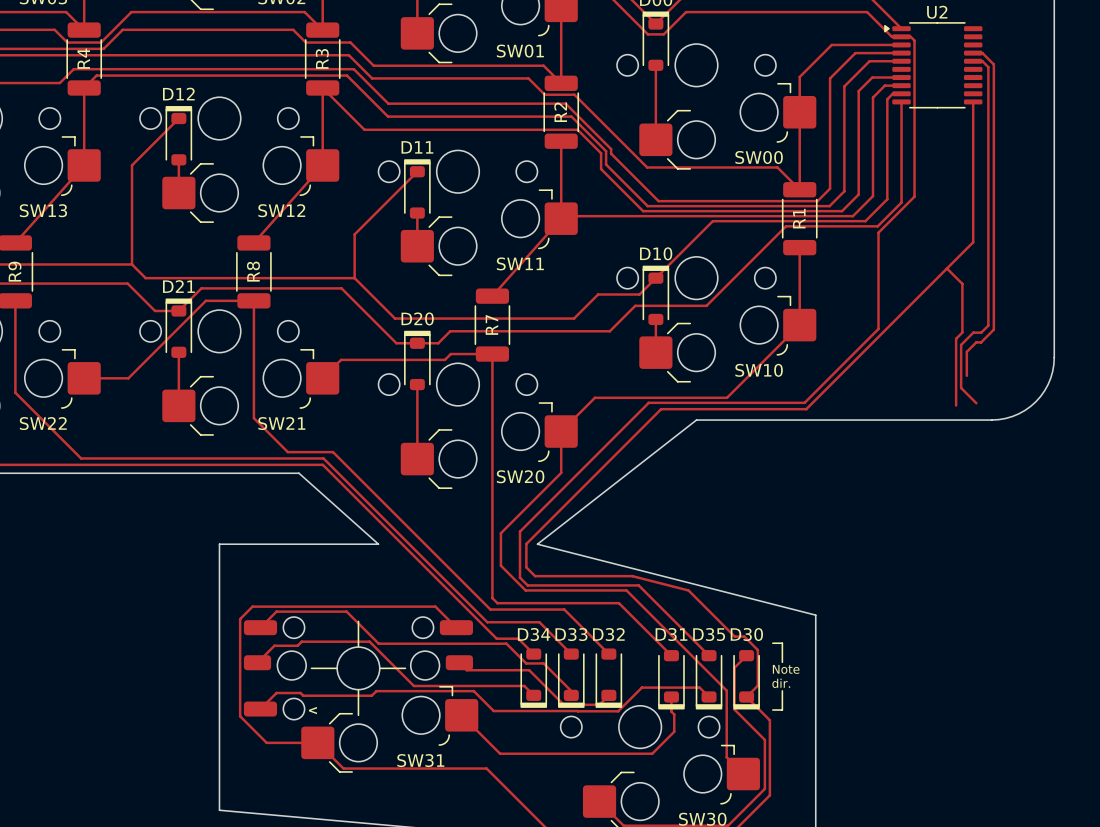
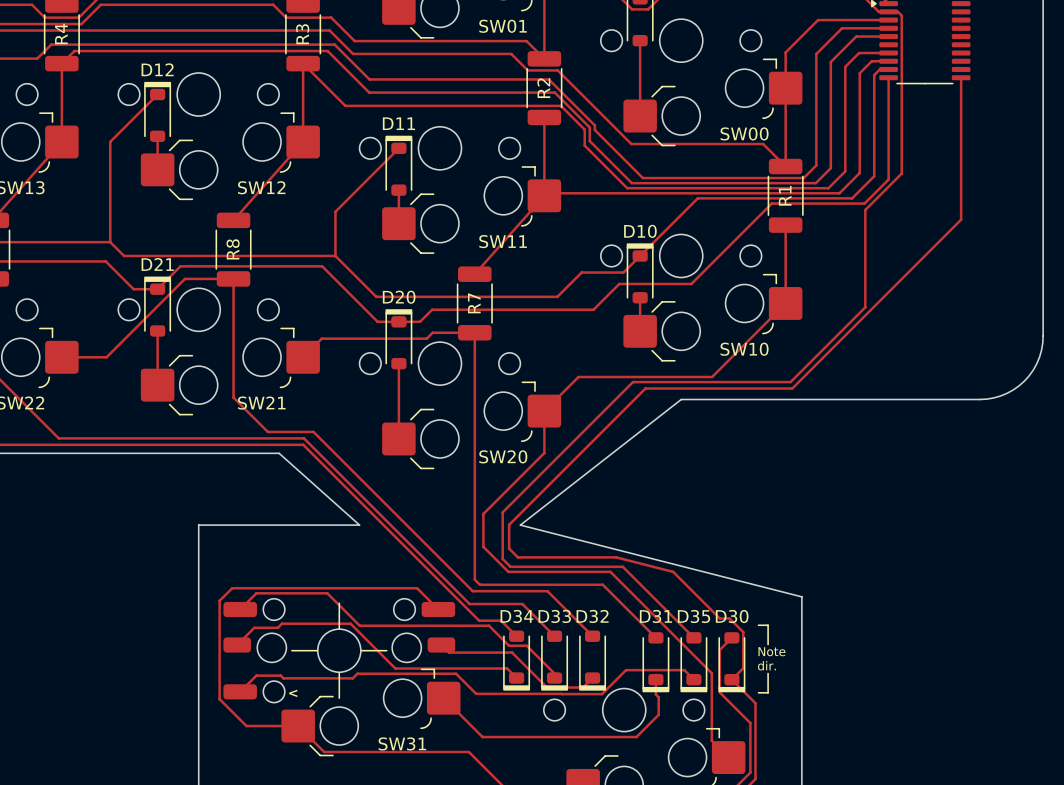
track: (973, 53) (982, 53) (993, 64) (993, 329) (981, 342) (976, 342) (966, 351) (966, 375) -> none
track: (973, 61) (982, 61) (988, 67) (988, 325) (981, 332) (973, 332) (961, 344) (961, 388) (976, 403) -> none
track: (946, 268) (962, 283) (962, 332) (956, 338) (956, 405) -> none

